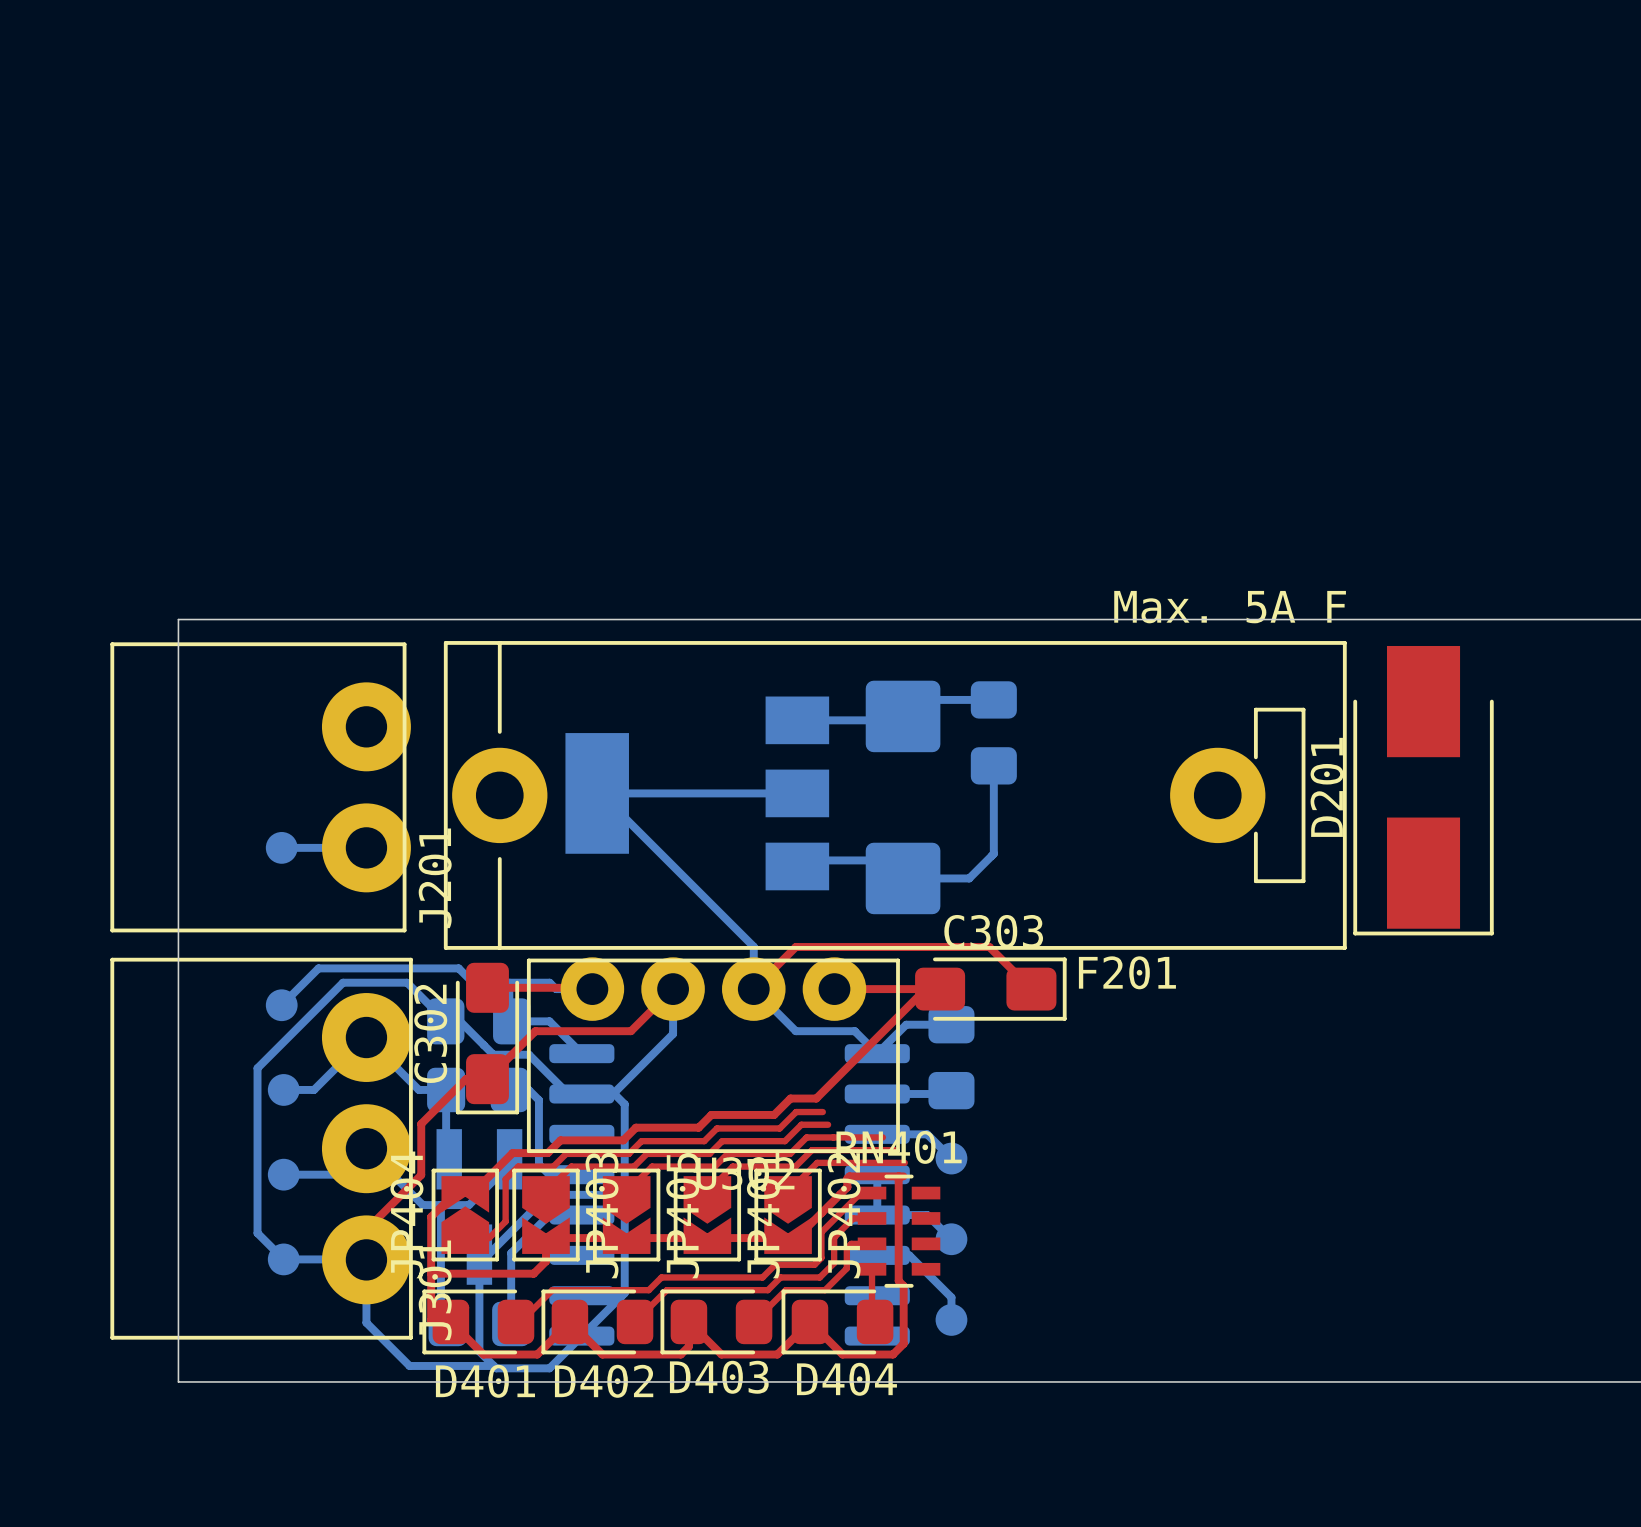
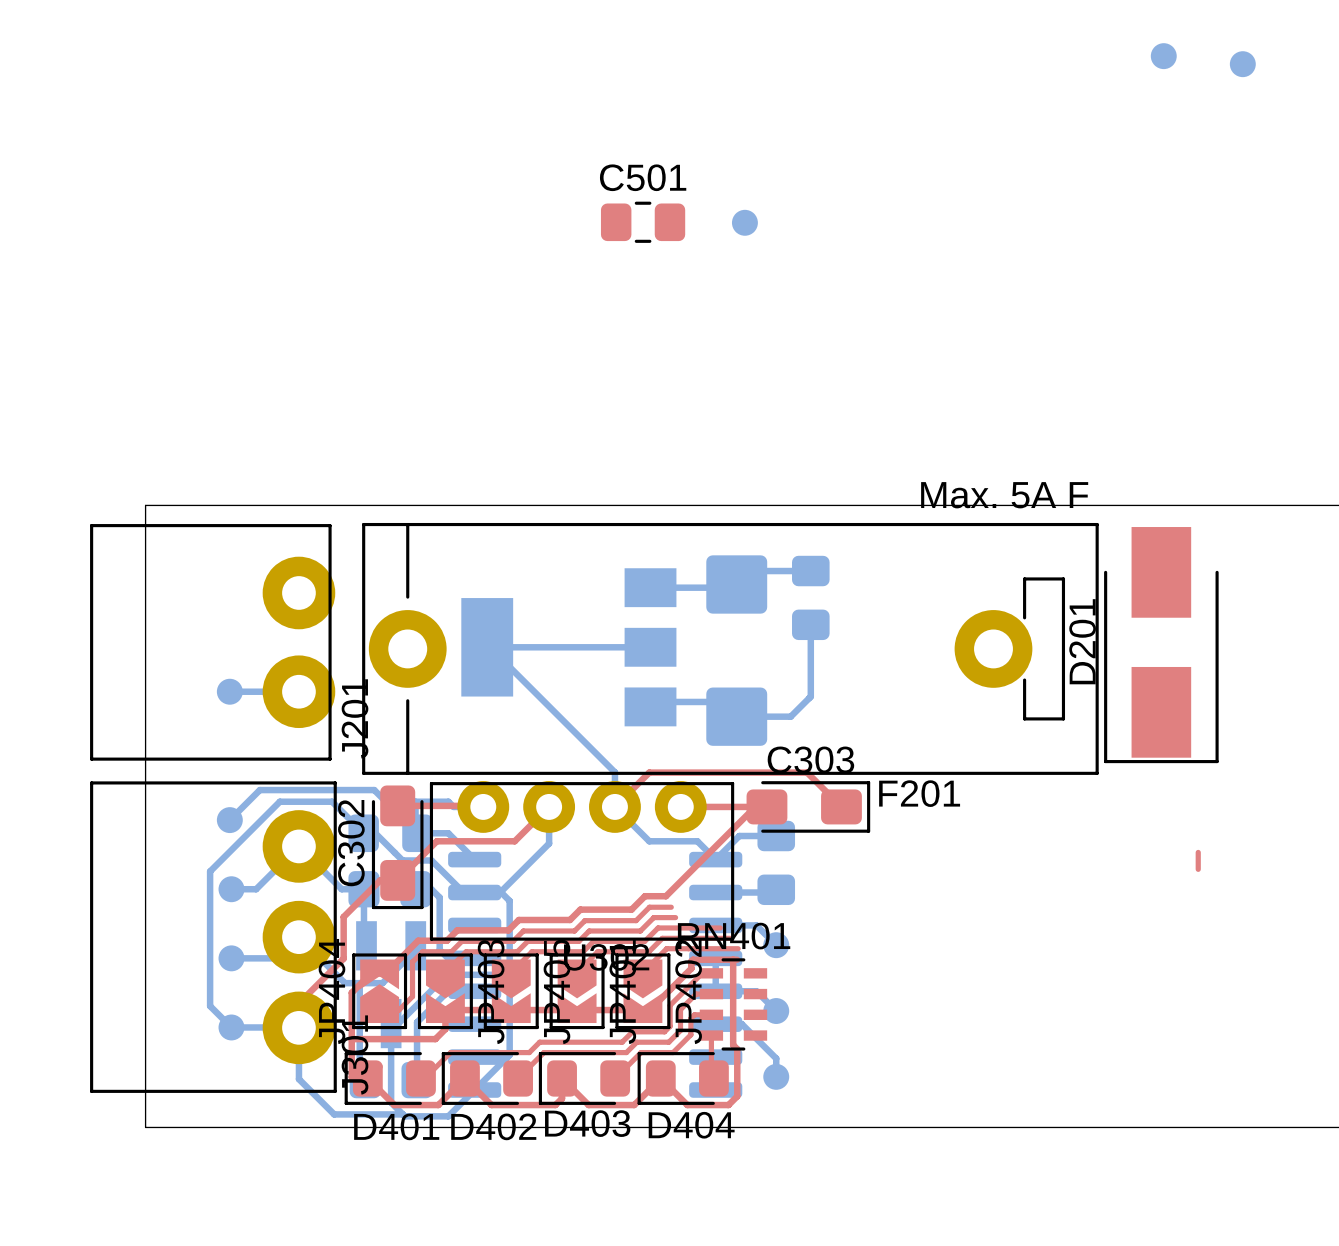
part: none -> (1163, 56)
part: none -> (1242, 64)
C501: none -> (643, 222)
part: none -> (744, 222)
top track: none -> (1198, 852) (1198, 869)

